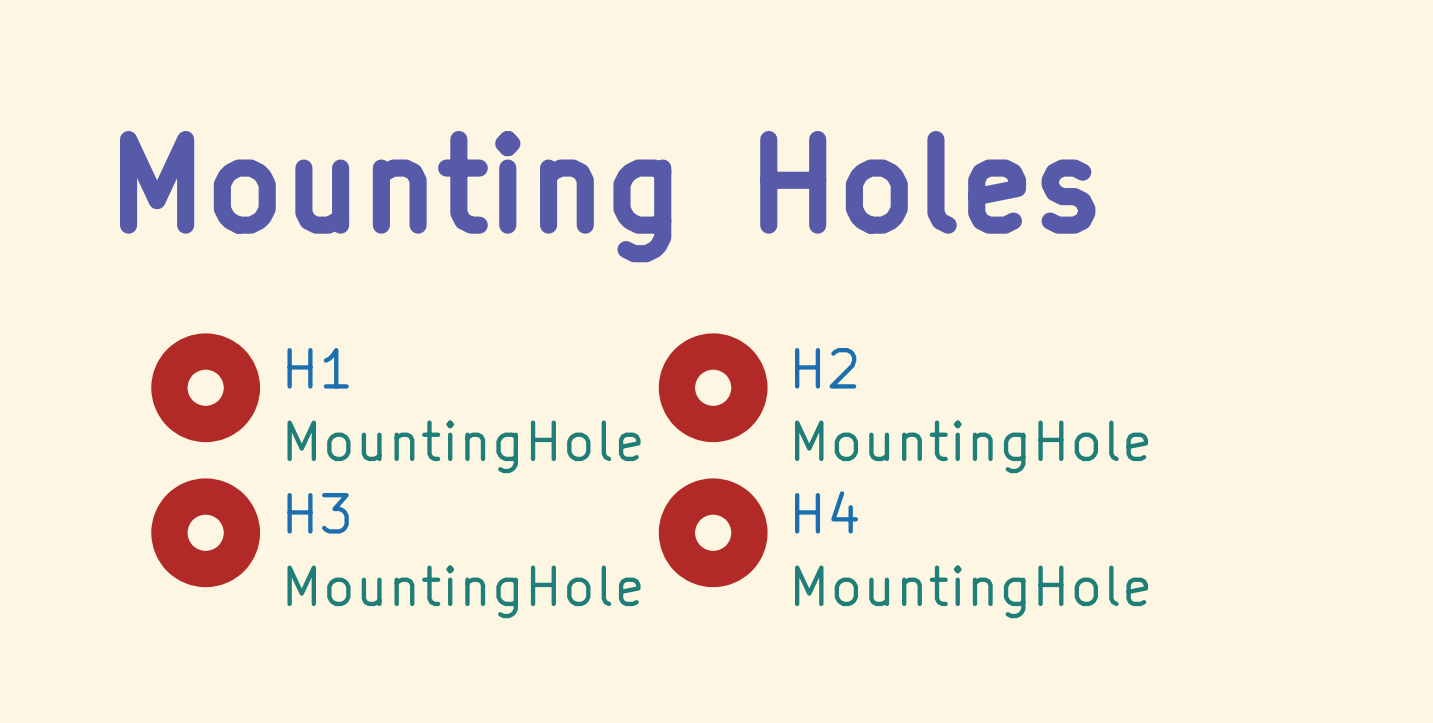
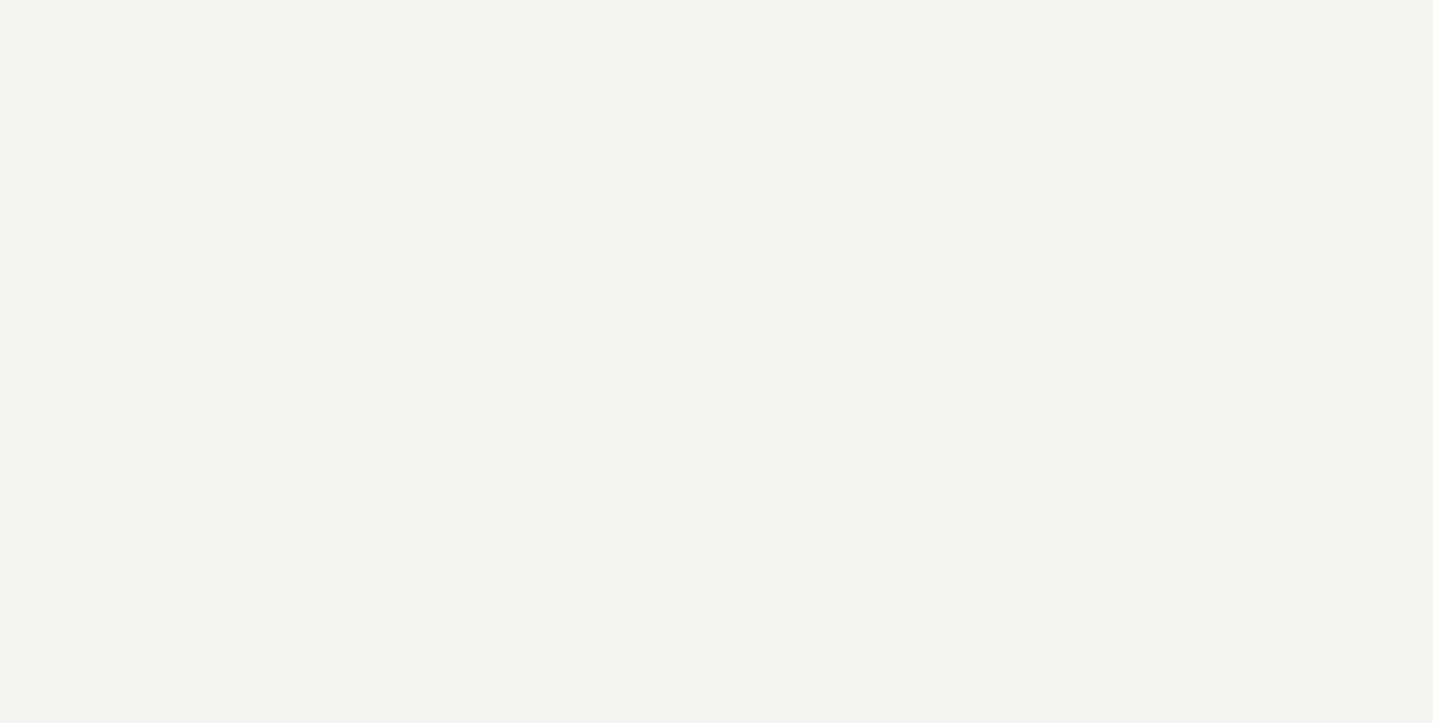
text: Mounting Holes (607, 196) -> none
H1: MountingHole (205, 387) -> none
H2: MountingHole (713, 387) -> none
H3: MountingHole (205, 532) -> none
H4: MountingHole (713, 532) -> none

